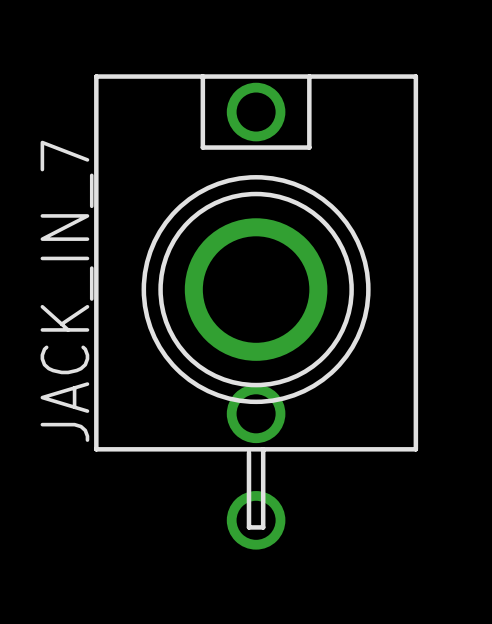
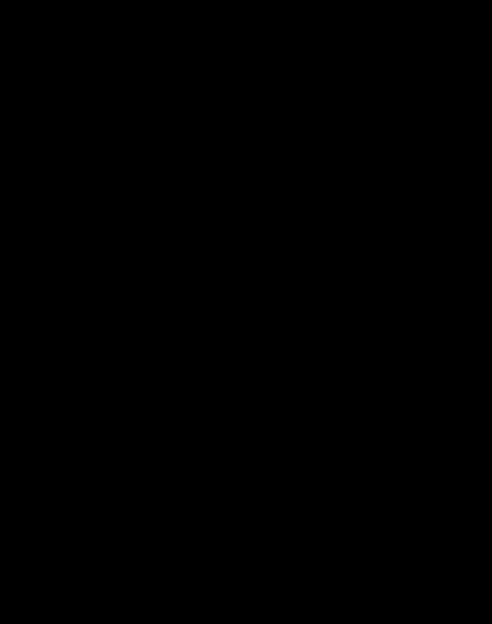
JACK_IN_7: (256, 311) -> none

